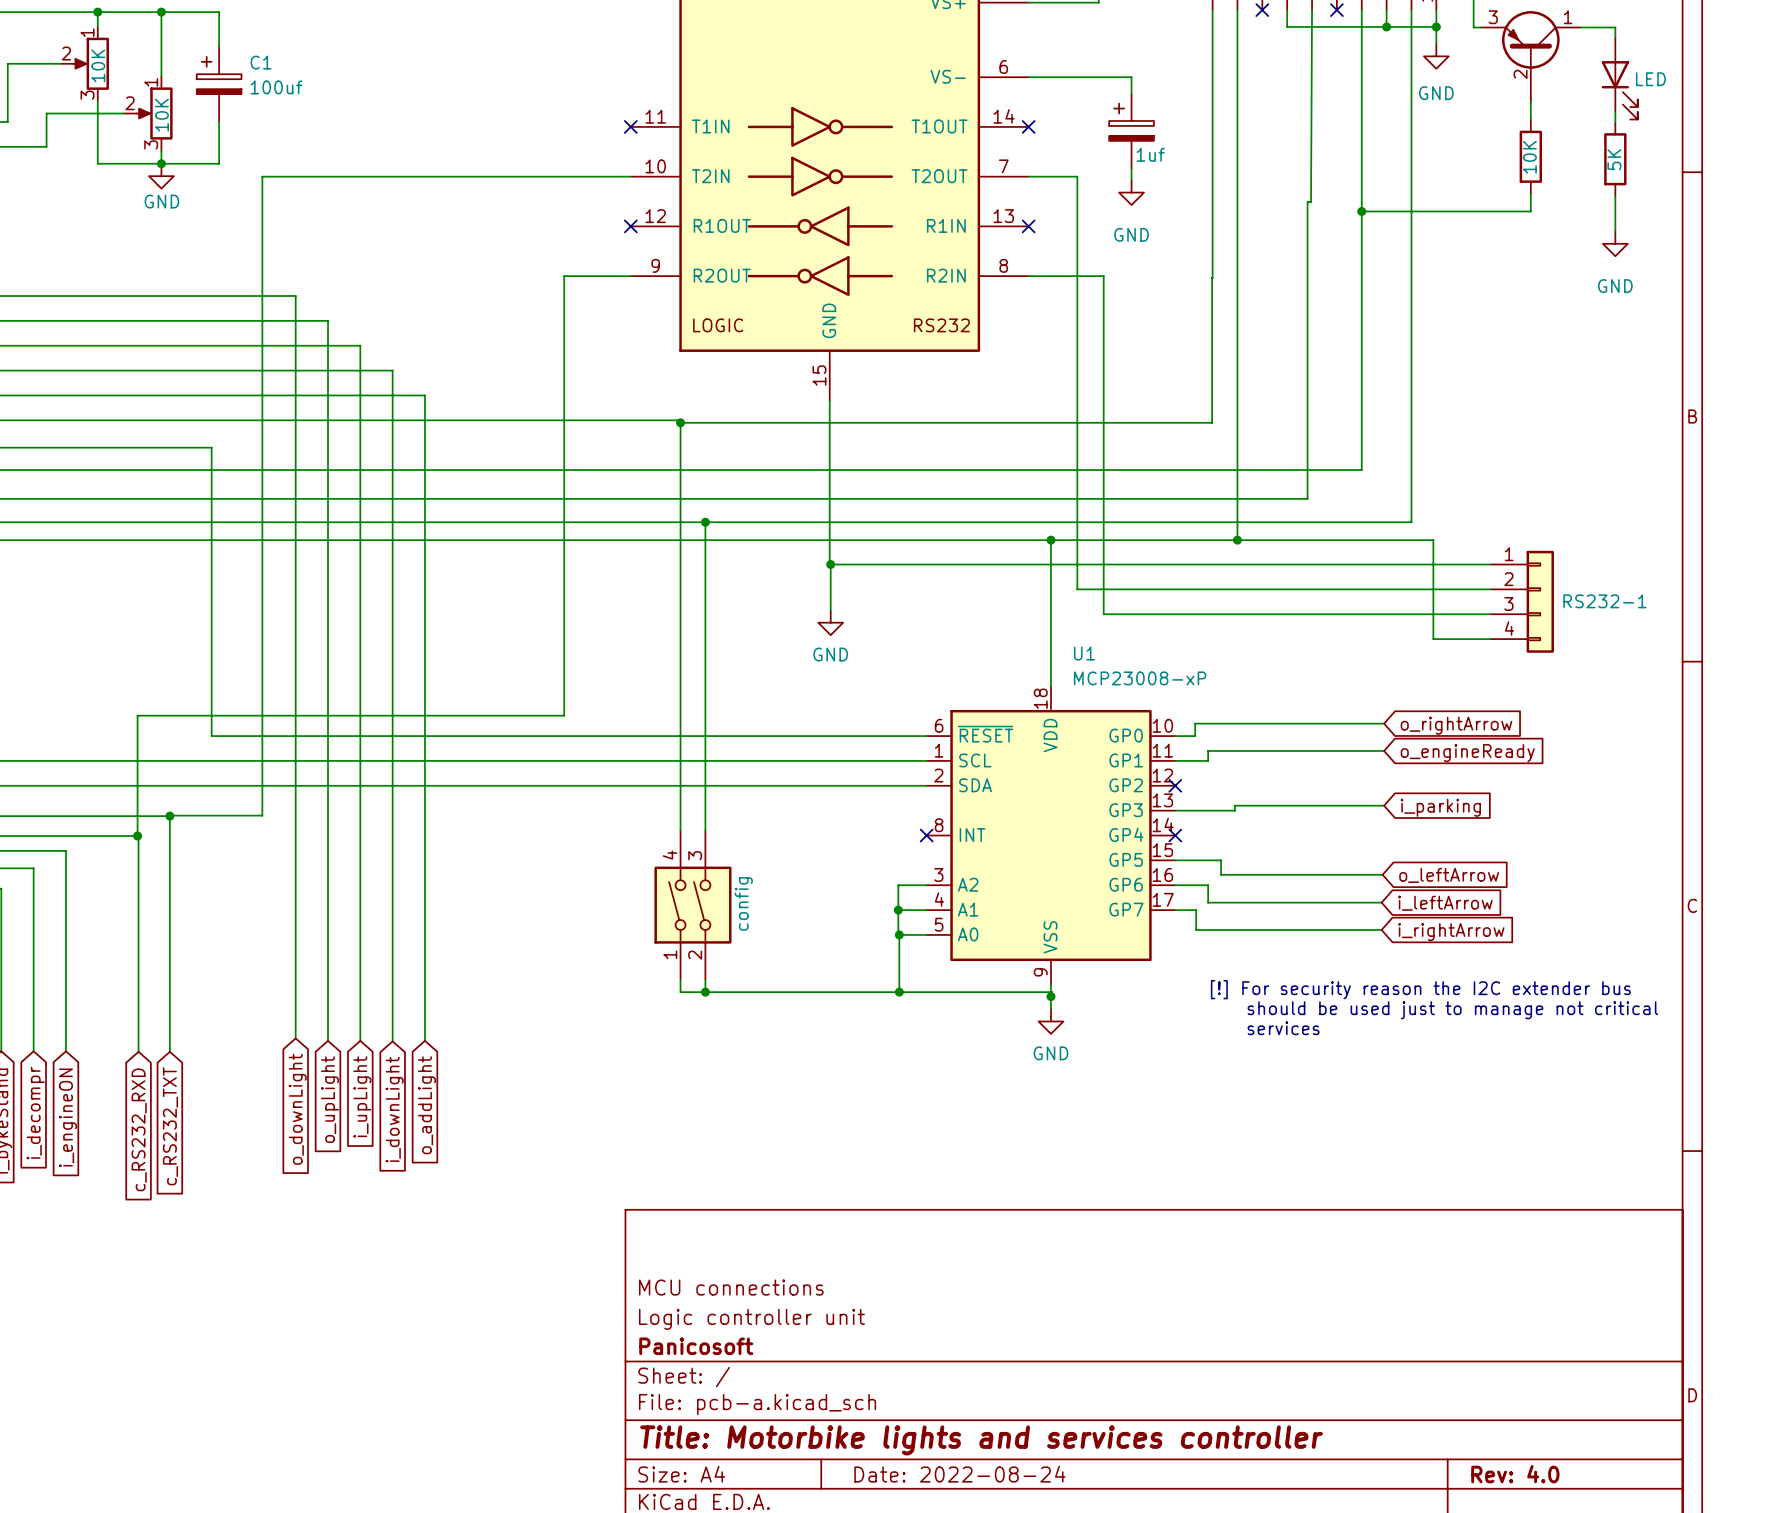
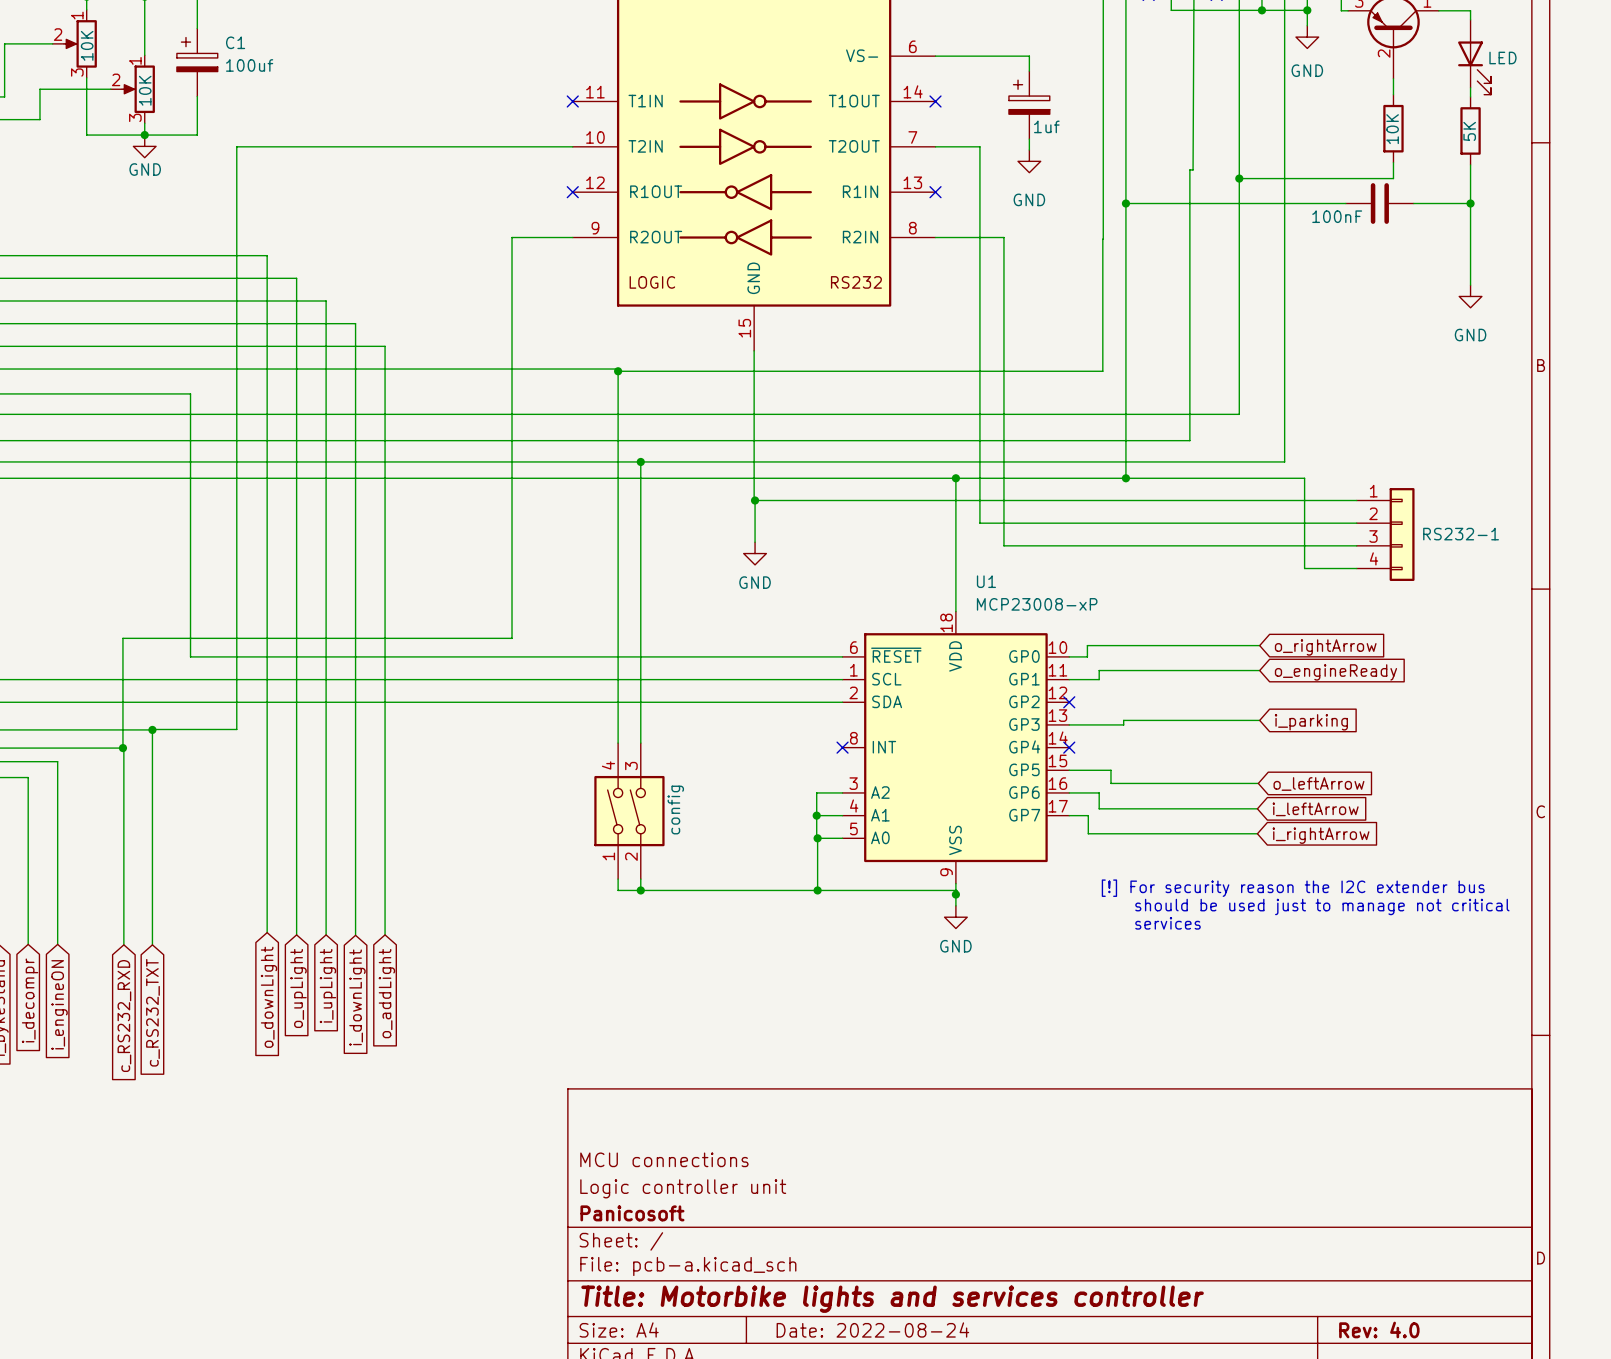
wire: none -> (1470, 196) (1470, 285)
wire: none -> (1125, 203) (1345, 203)
junction: none -> (1125, 203)
part: none -> 100nF (1379, 203)
wire: none -> (1413, 203) (1470, 203)
junction: none -> (1470, 203)
power symbol position: GND (1615, 243) -> GND (1470, 296)

